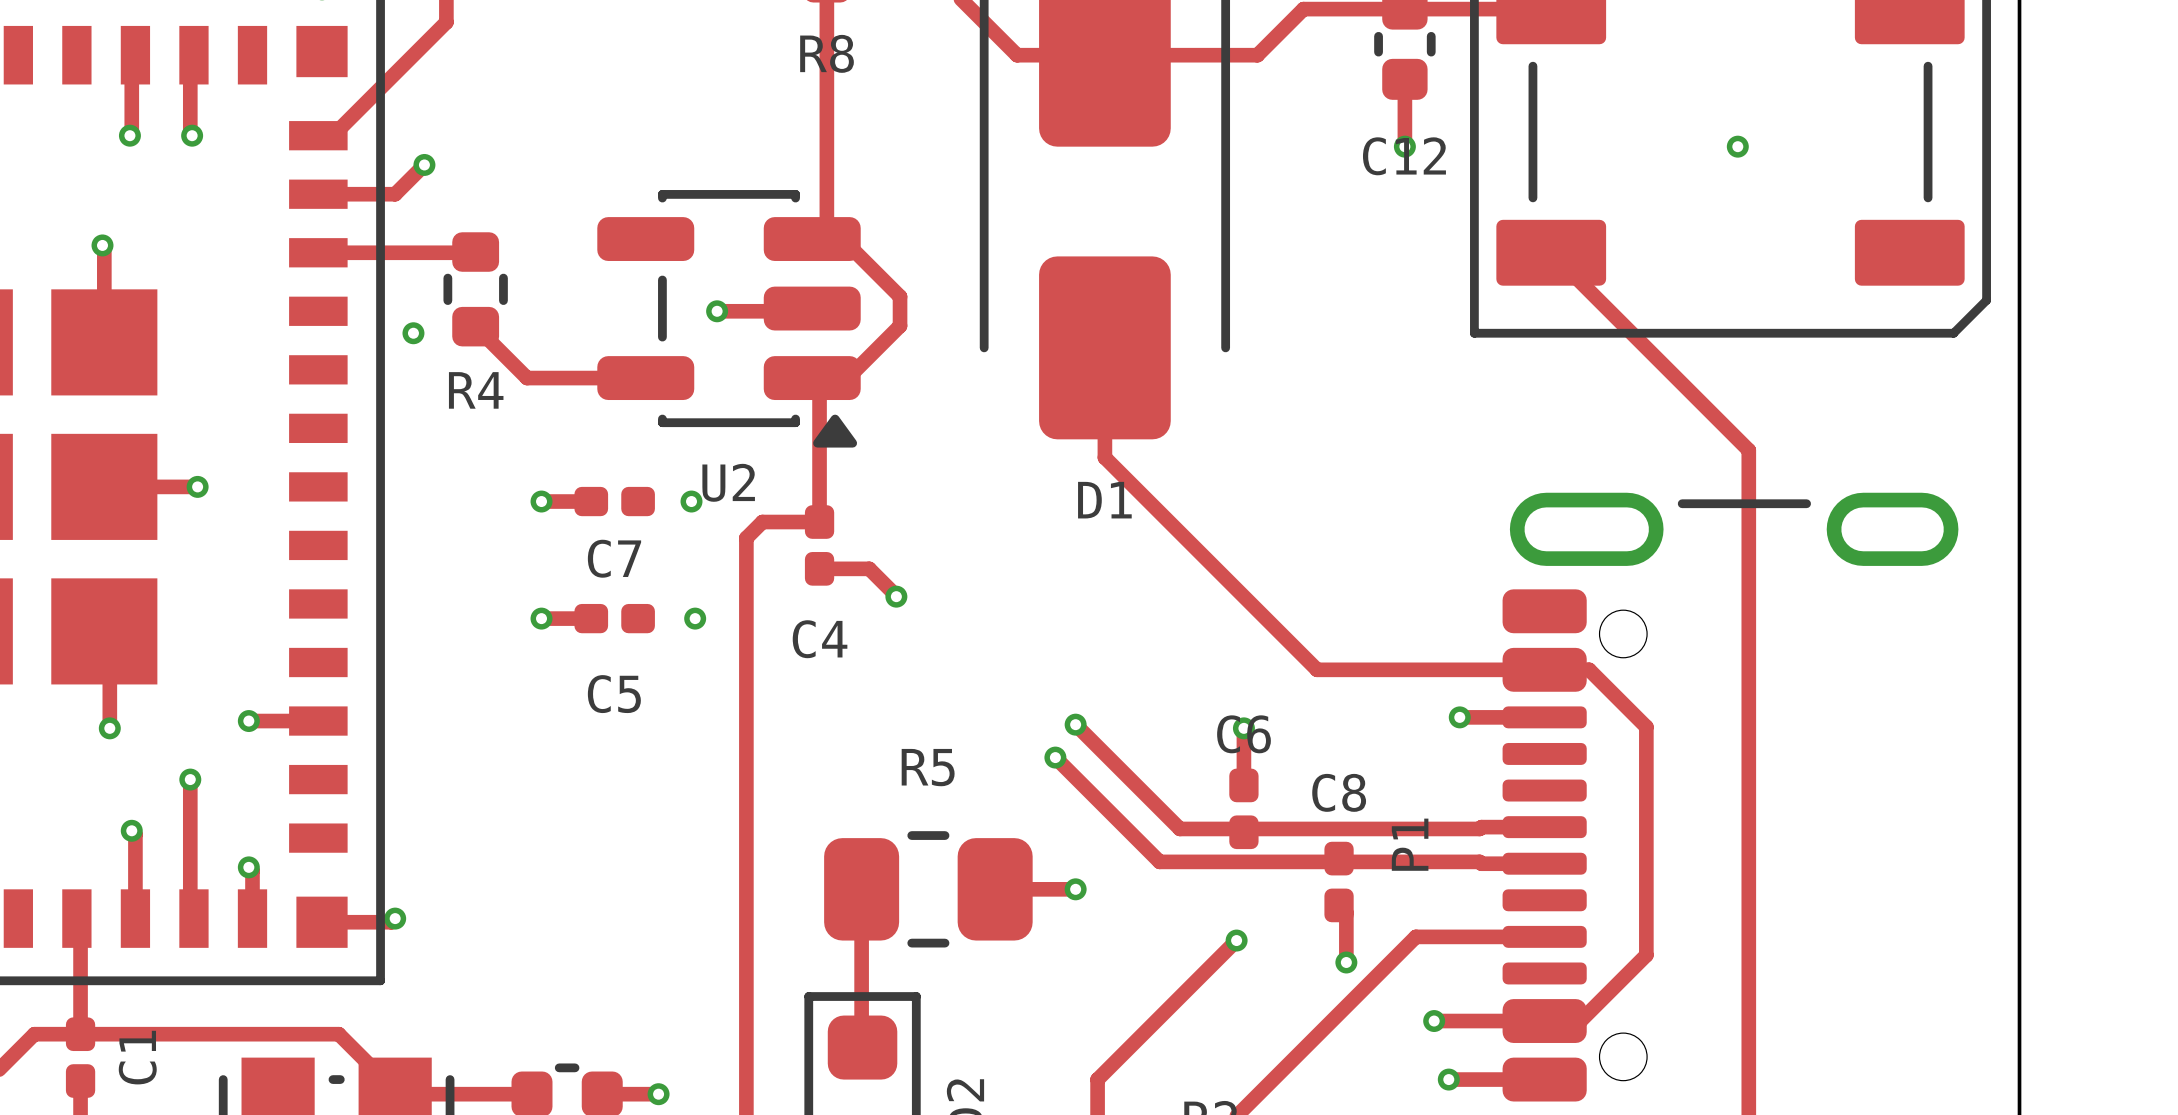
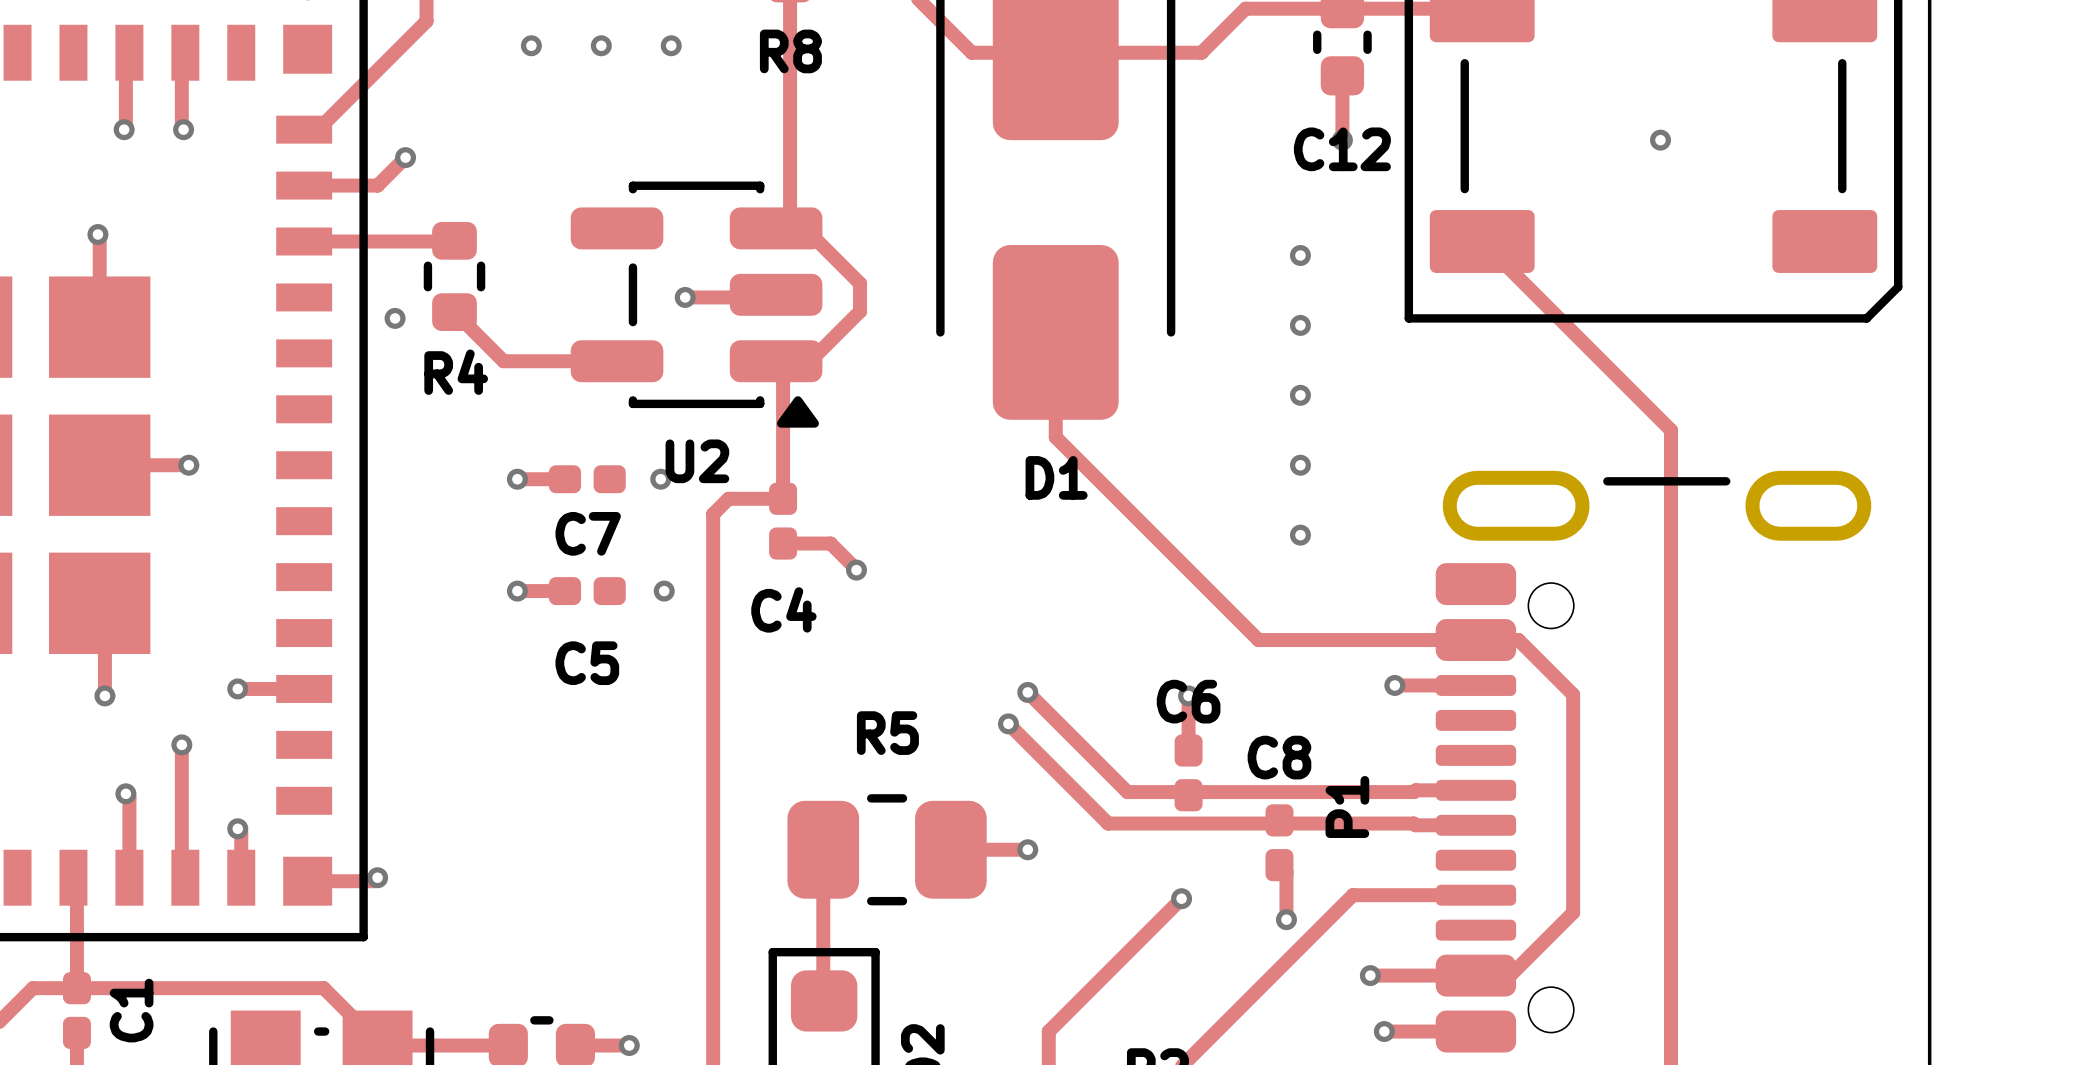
via: none -> (531, 45)
via: none -> (601, 45)
via: none -> (671, 45)
via: none -> (1300, 255)
via: none -> (1300, 325)
via: none -> (1300, 395)
via: none -> (1300, 465)
via: none -> (1300, 535)

